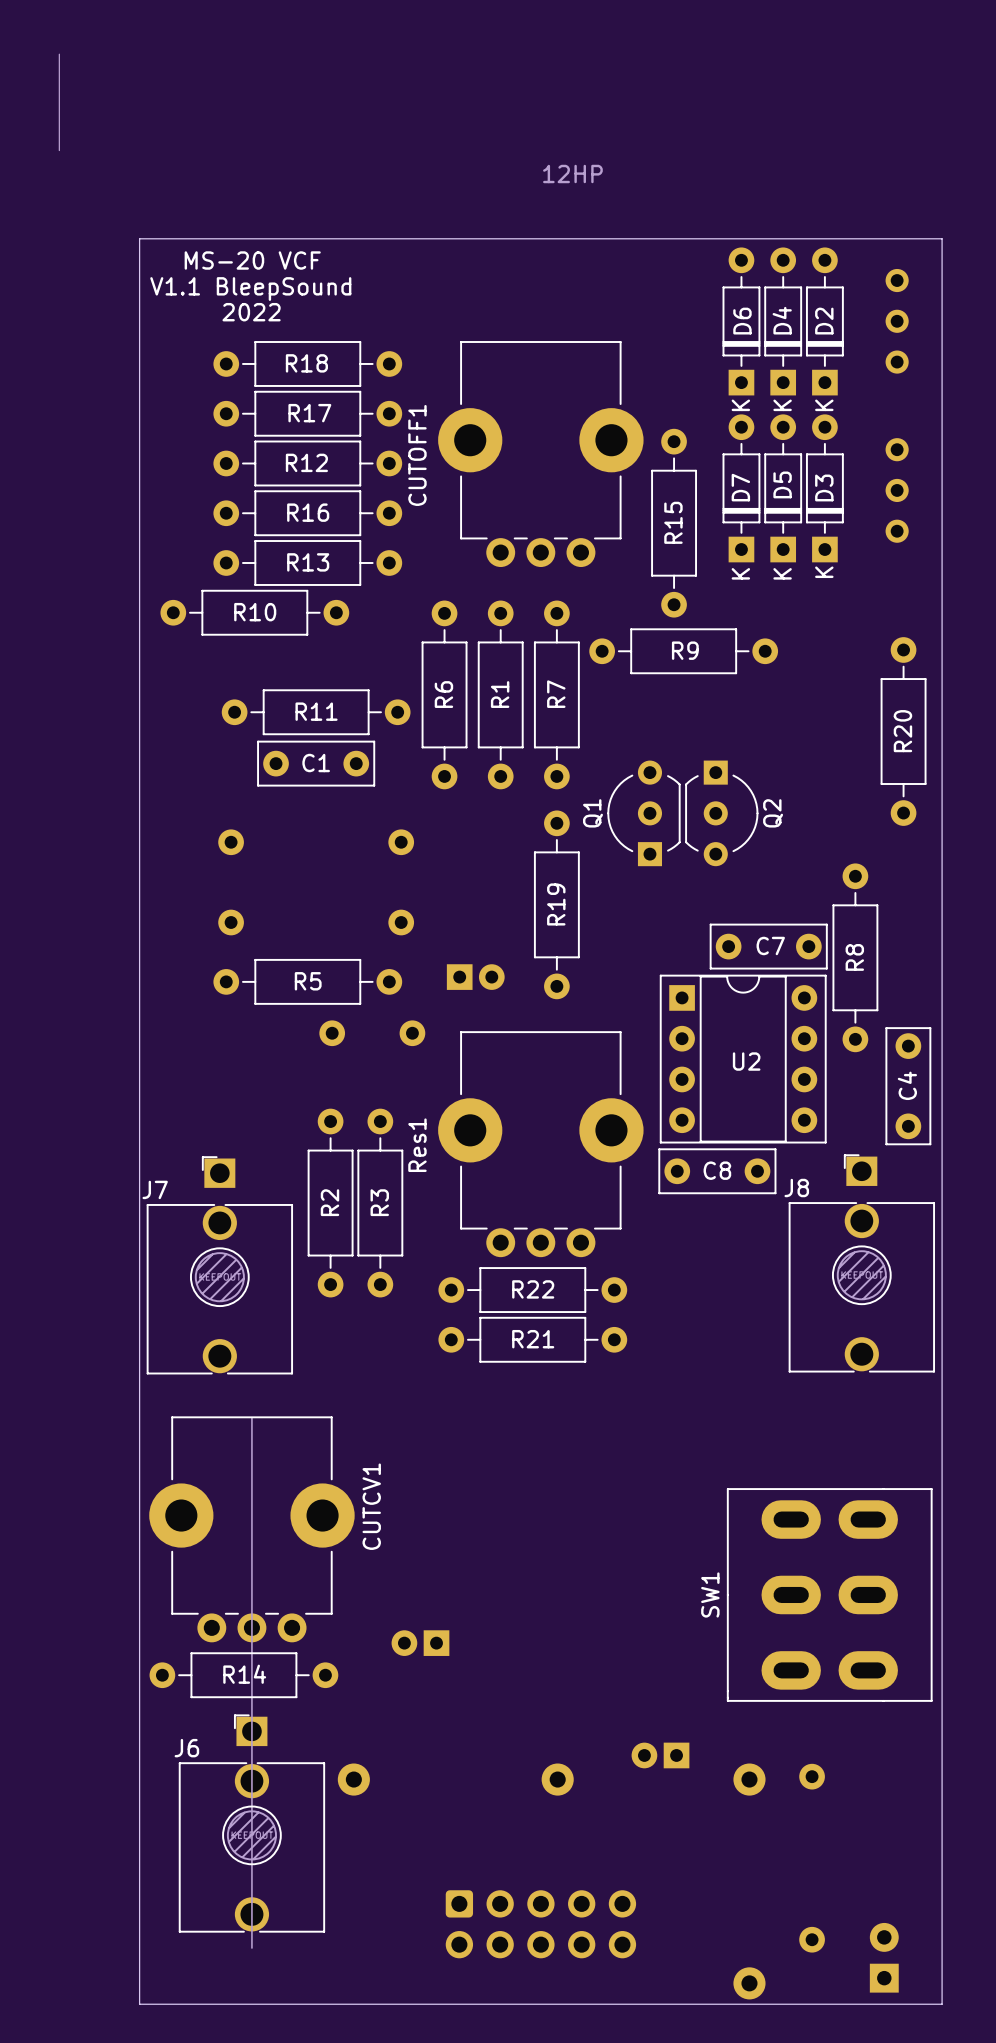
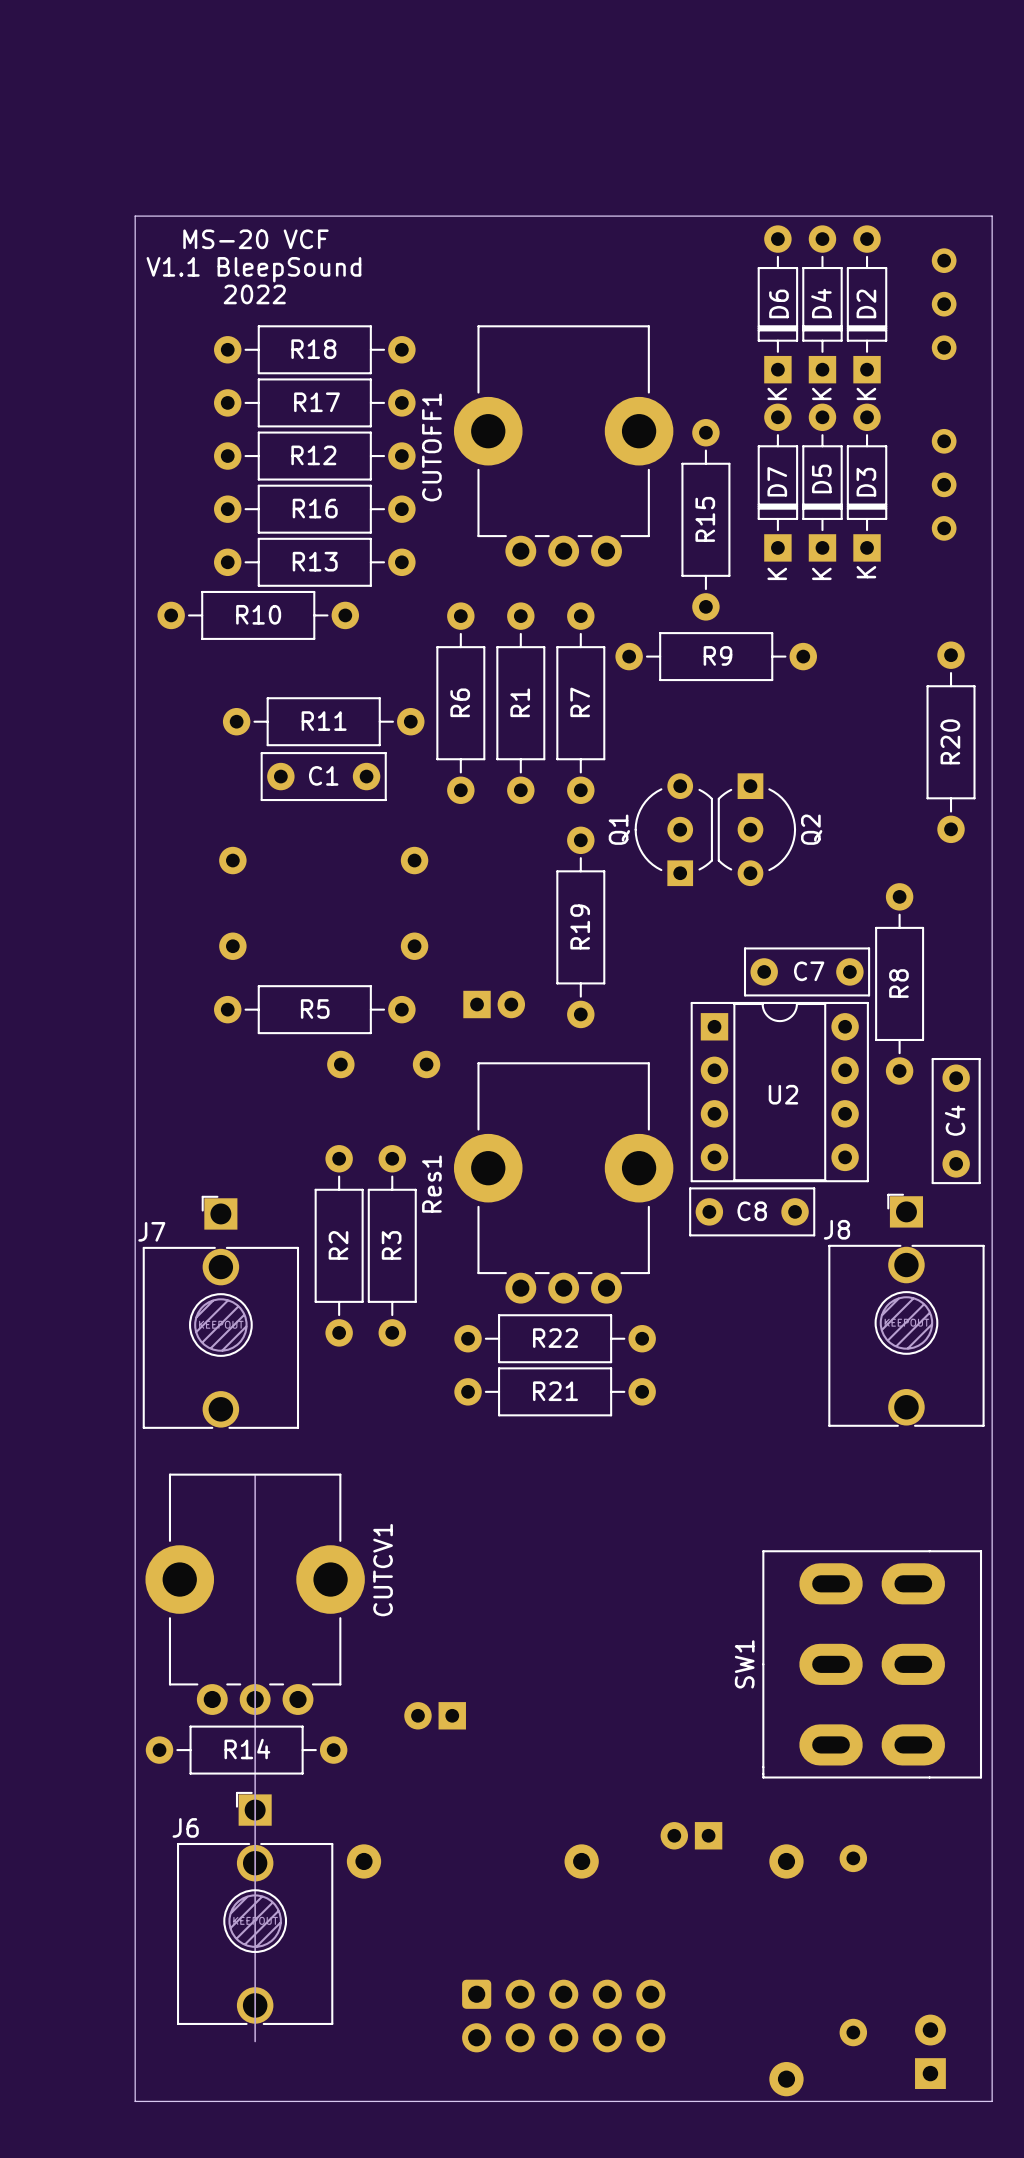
line: (59, 54) (59, 150) -> none
text: 12HP (572, 174) -> none

